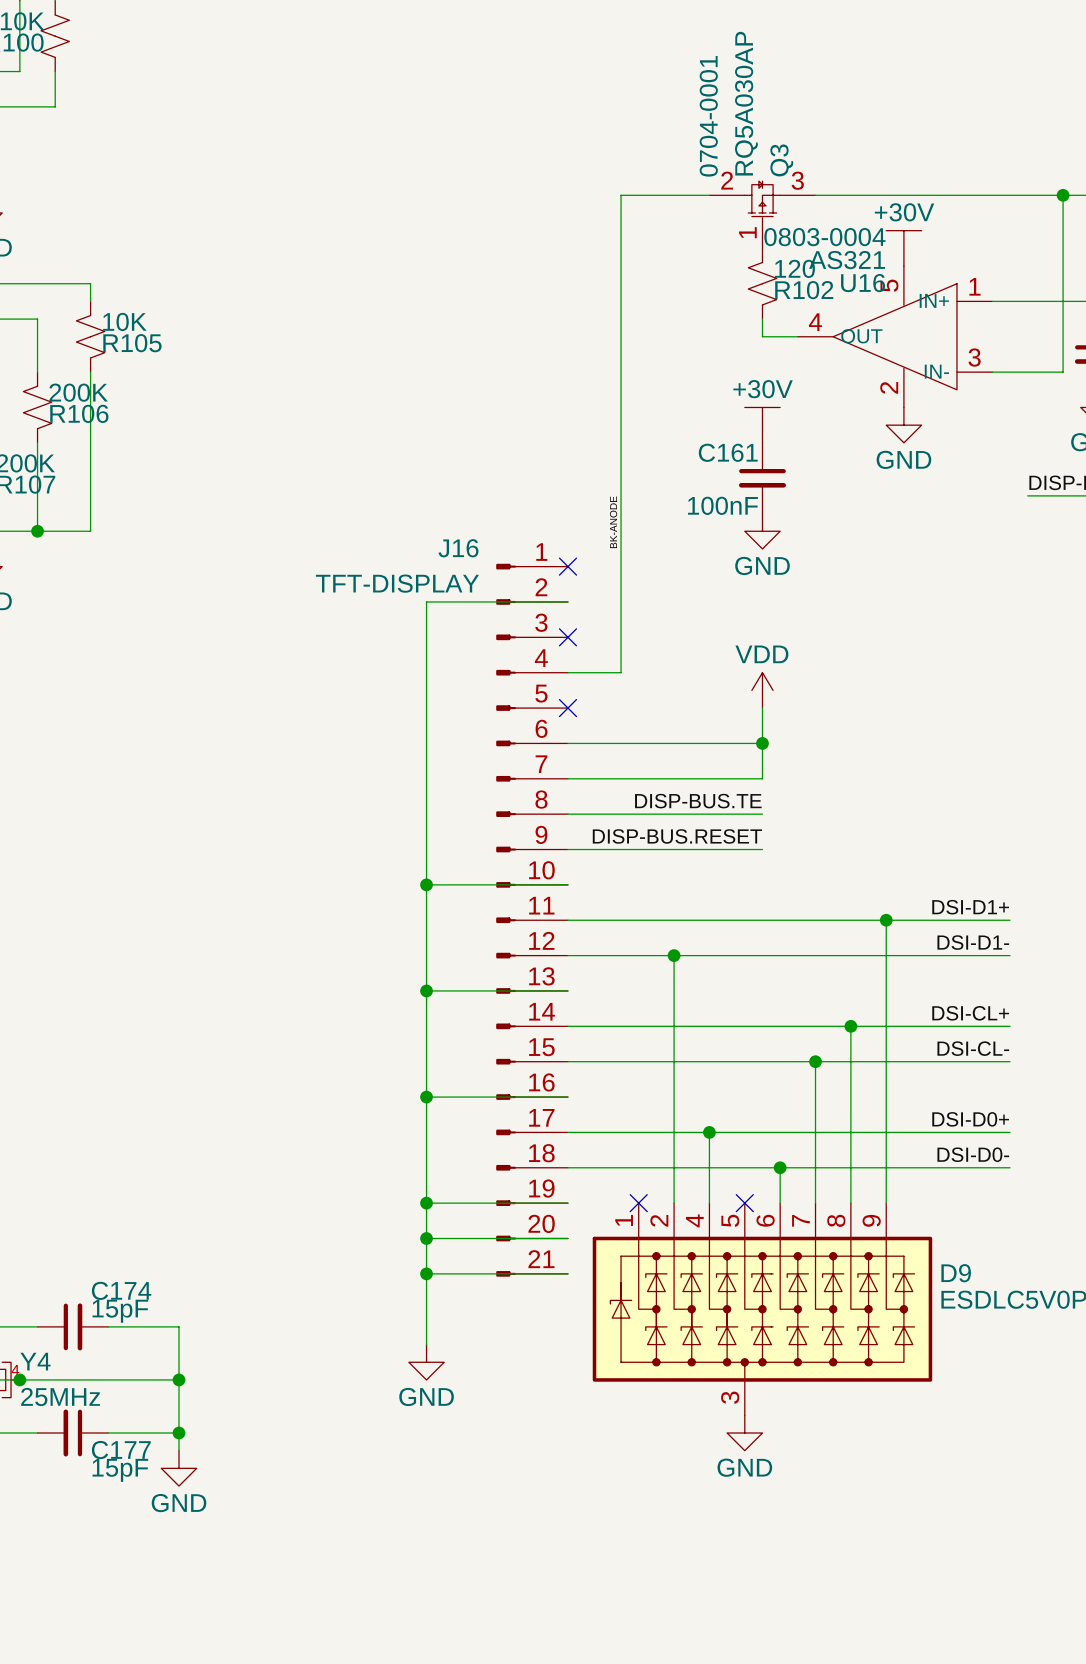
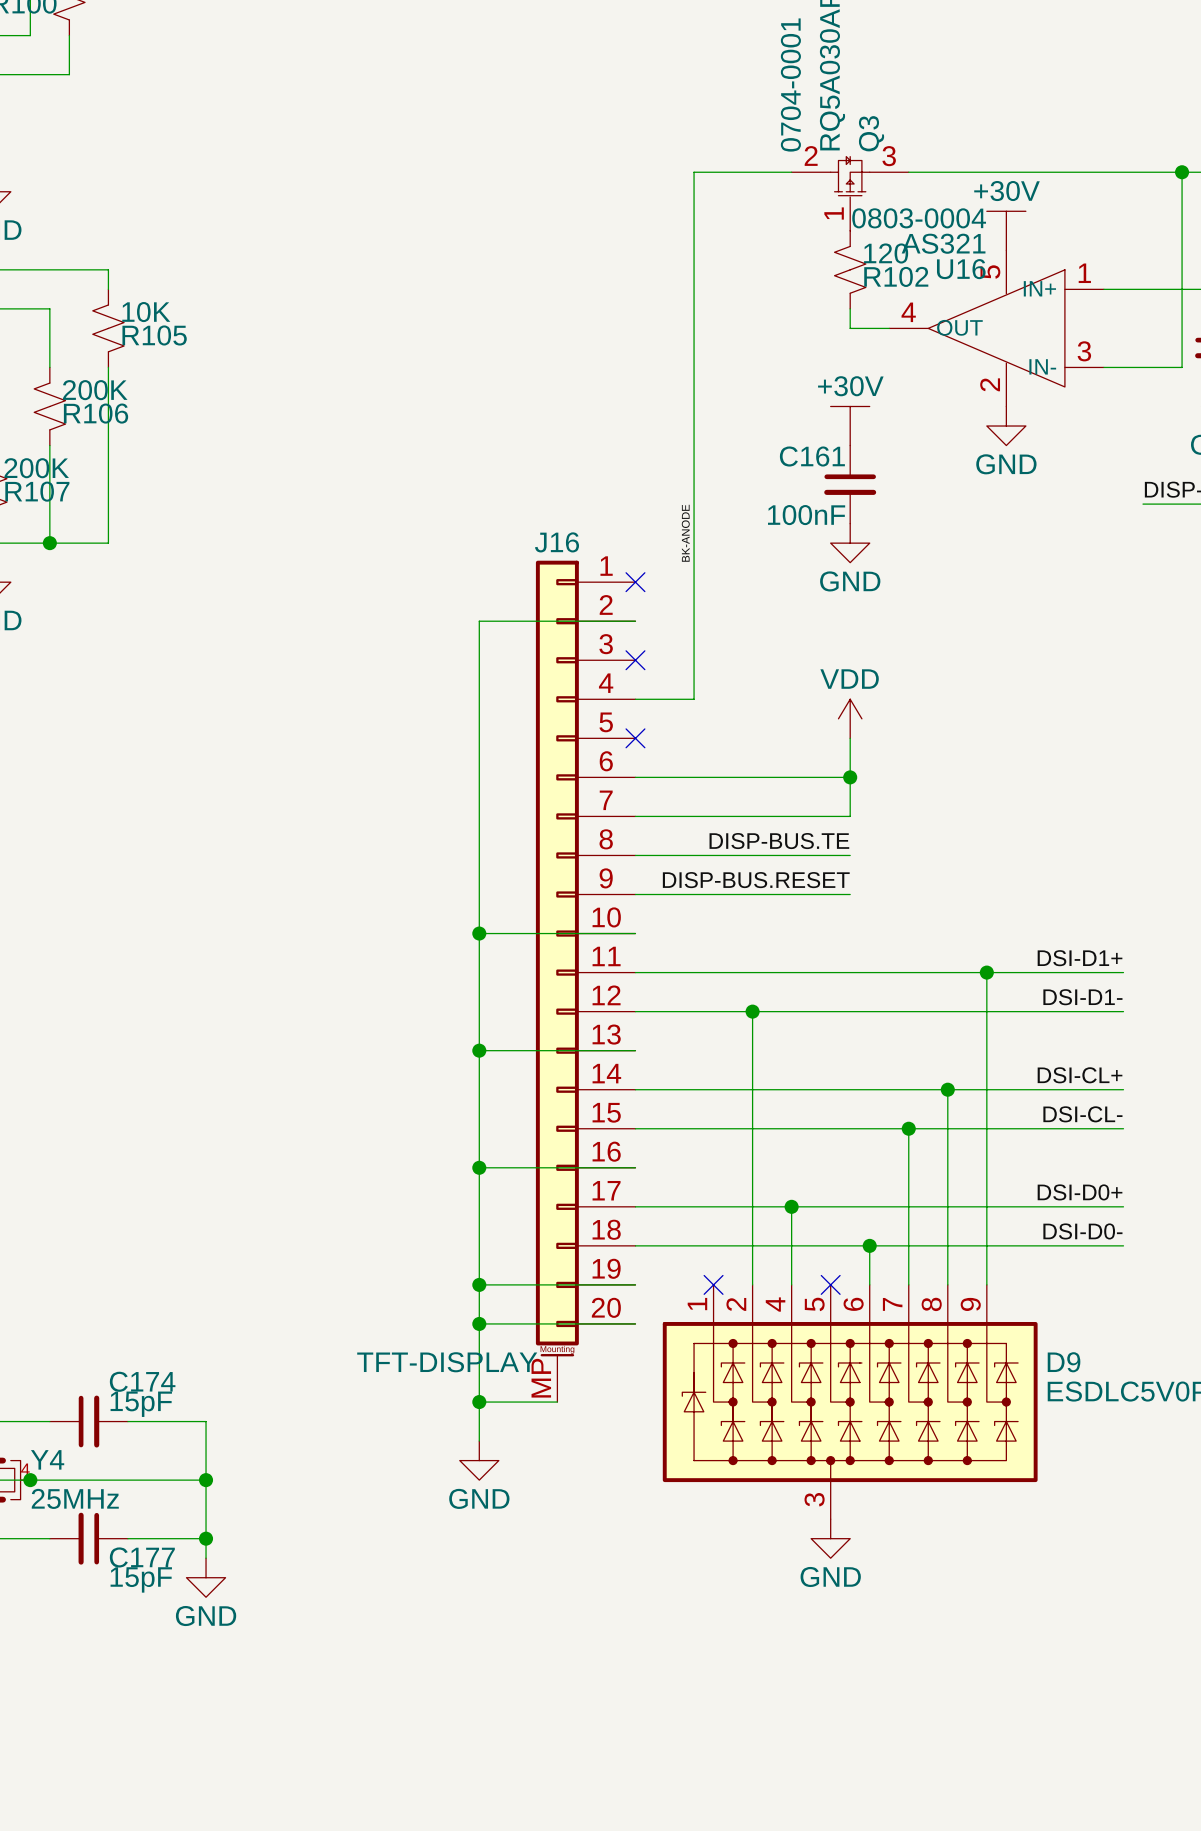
J16 name position: J16 (458, 548) -> J16 (556, 542)
J16 symbol: [496, 563, 568, 1277] -> [535, 560, 636, 1403]
J16 value position: TFT-DISPLAY (397, 583) -> TFT-DISPLAY (447, 1362)
wire: (426, 1273) (567, 1273) -> none
junction position: (426, 1273) -> (479, 1402)
wire: none -> (479, 1402) (557, 1402)

